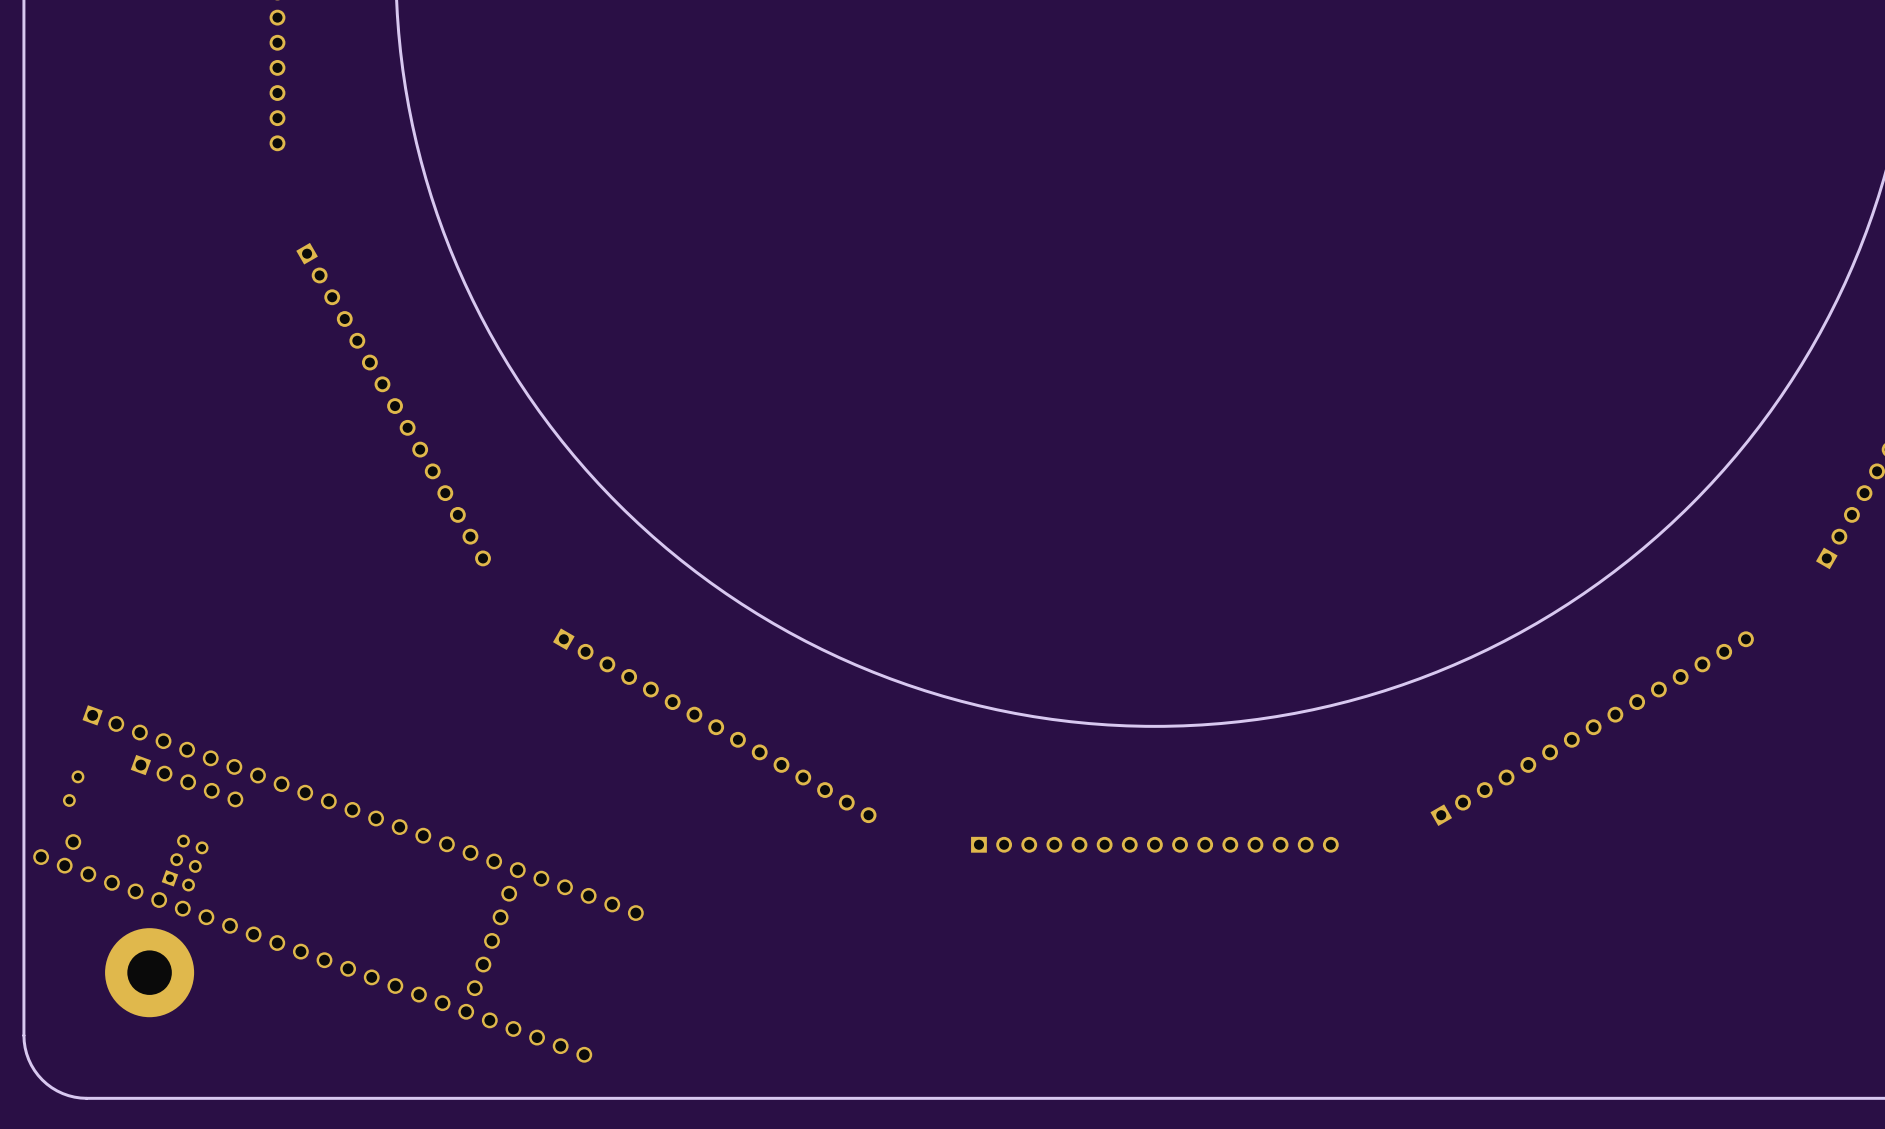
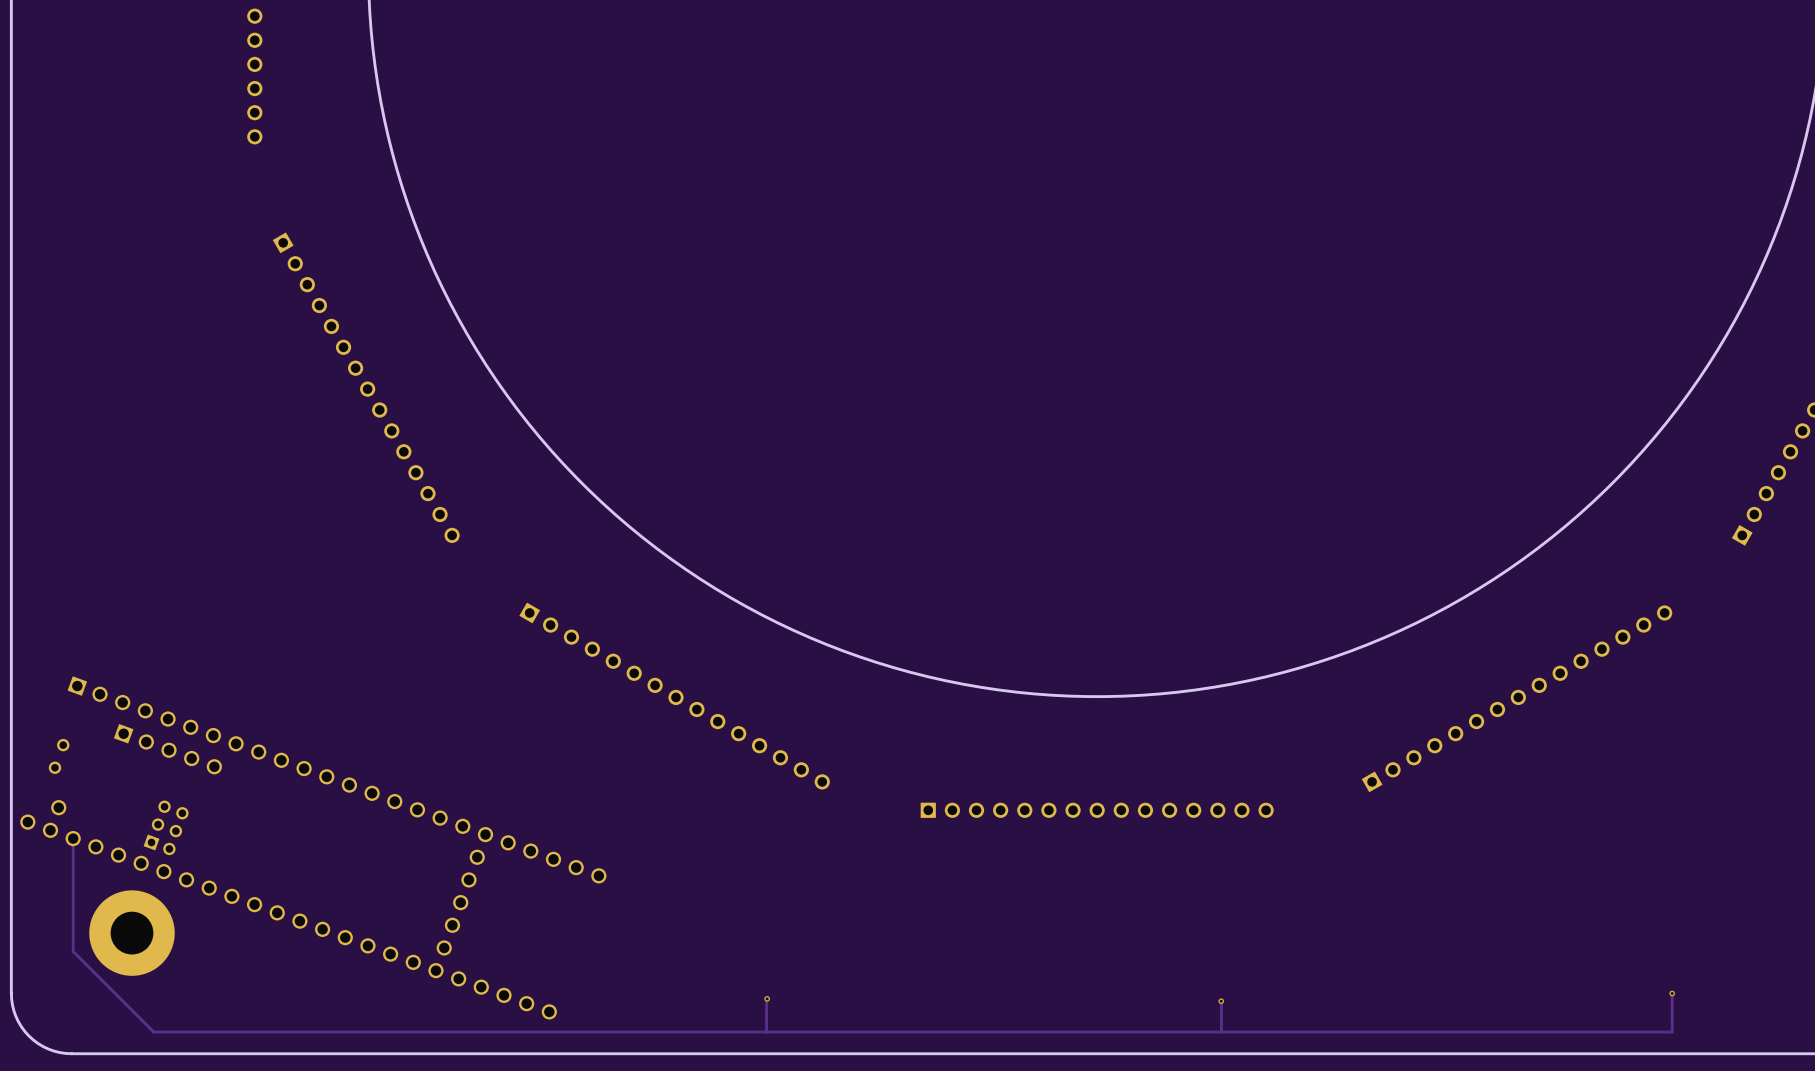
track: none -> (73, 838) (73, 951) (153, 1032) (1672, 1032) (1672, 993)
via: none -> (1672, 993)
track: none -> (767, 998) (766, 1032)
via: none -> (767, 998)
track: none -> (1221, 1001) (1221, 1032)
via: none -> (1221, 1001)

